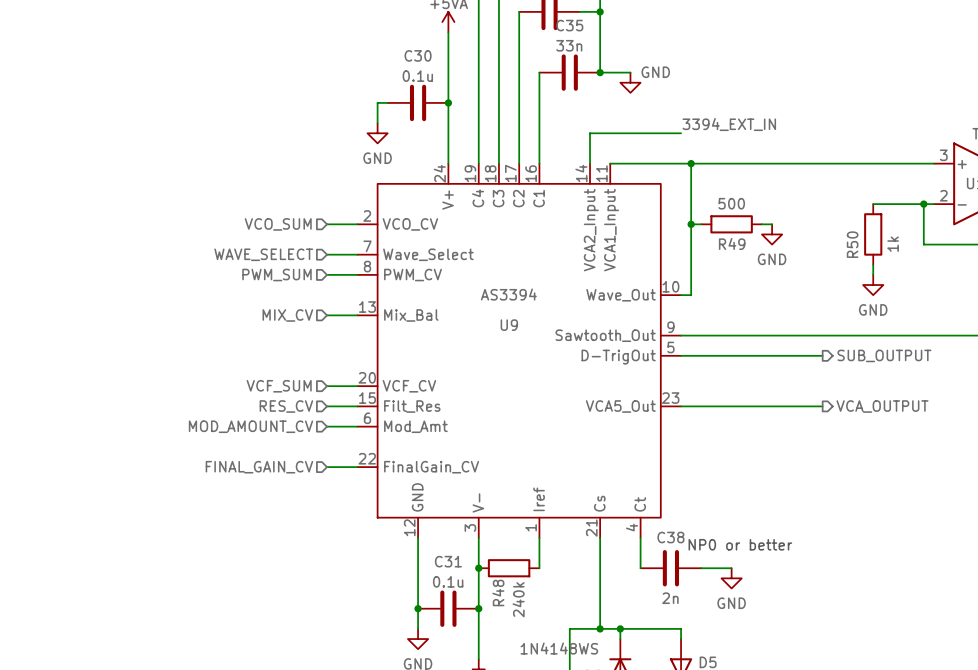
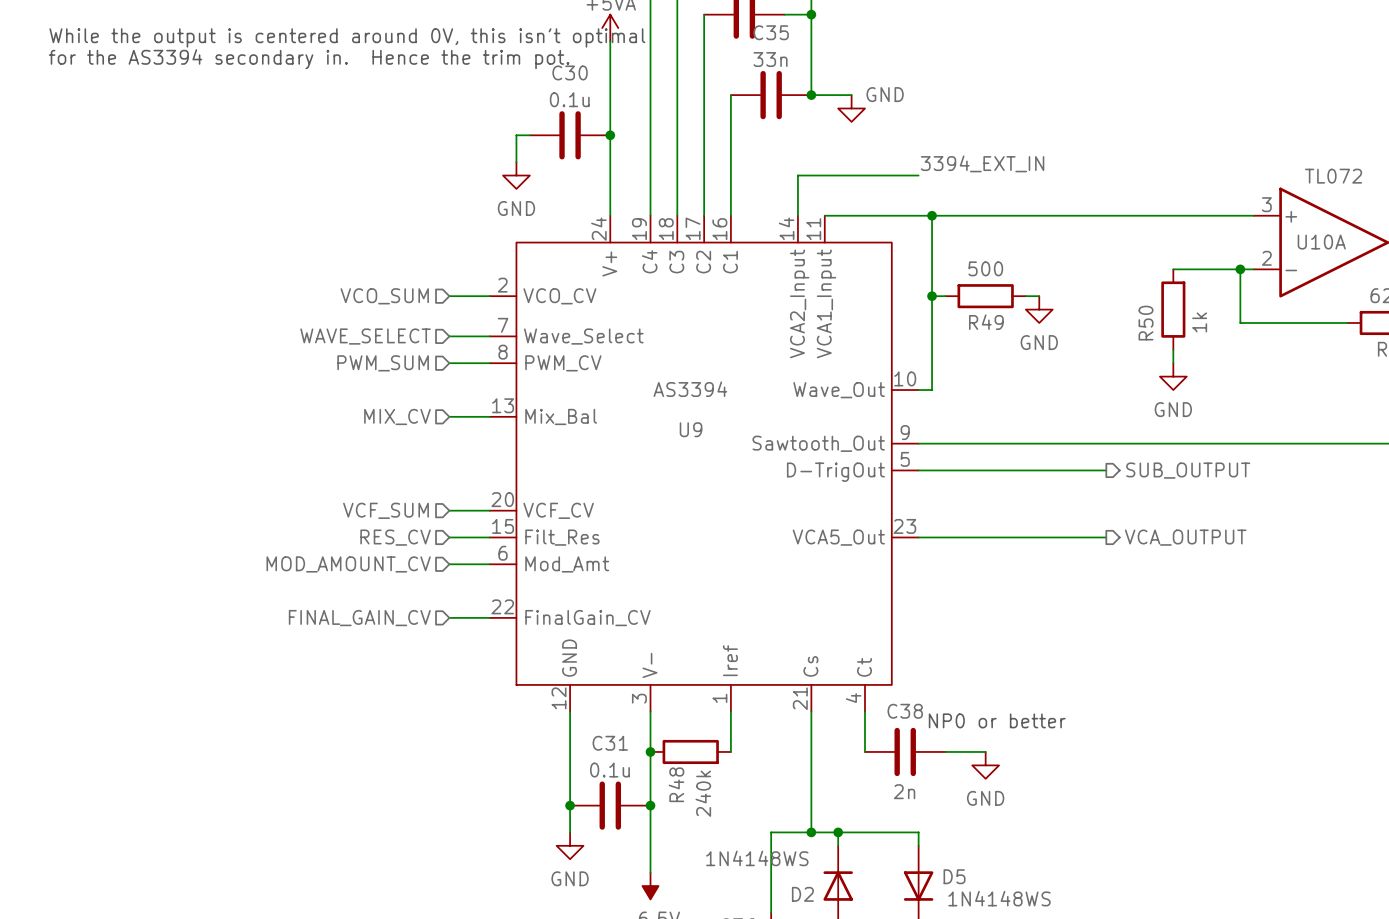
text: none -> While the output is centered around 0V, this isn't optimal (347, 37)
text: none -> for the AS3394 secondary in. Hence the trim pot. (309, 59)

